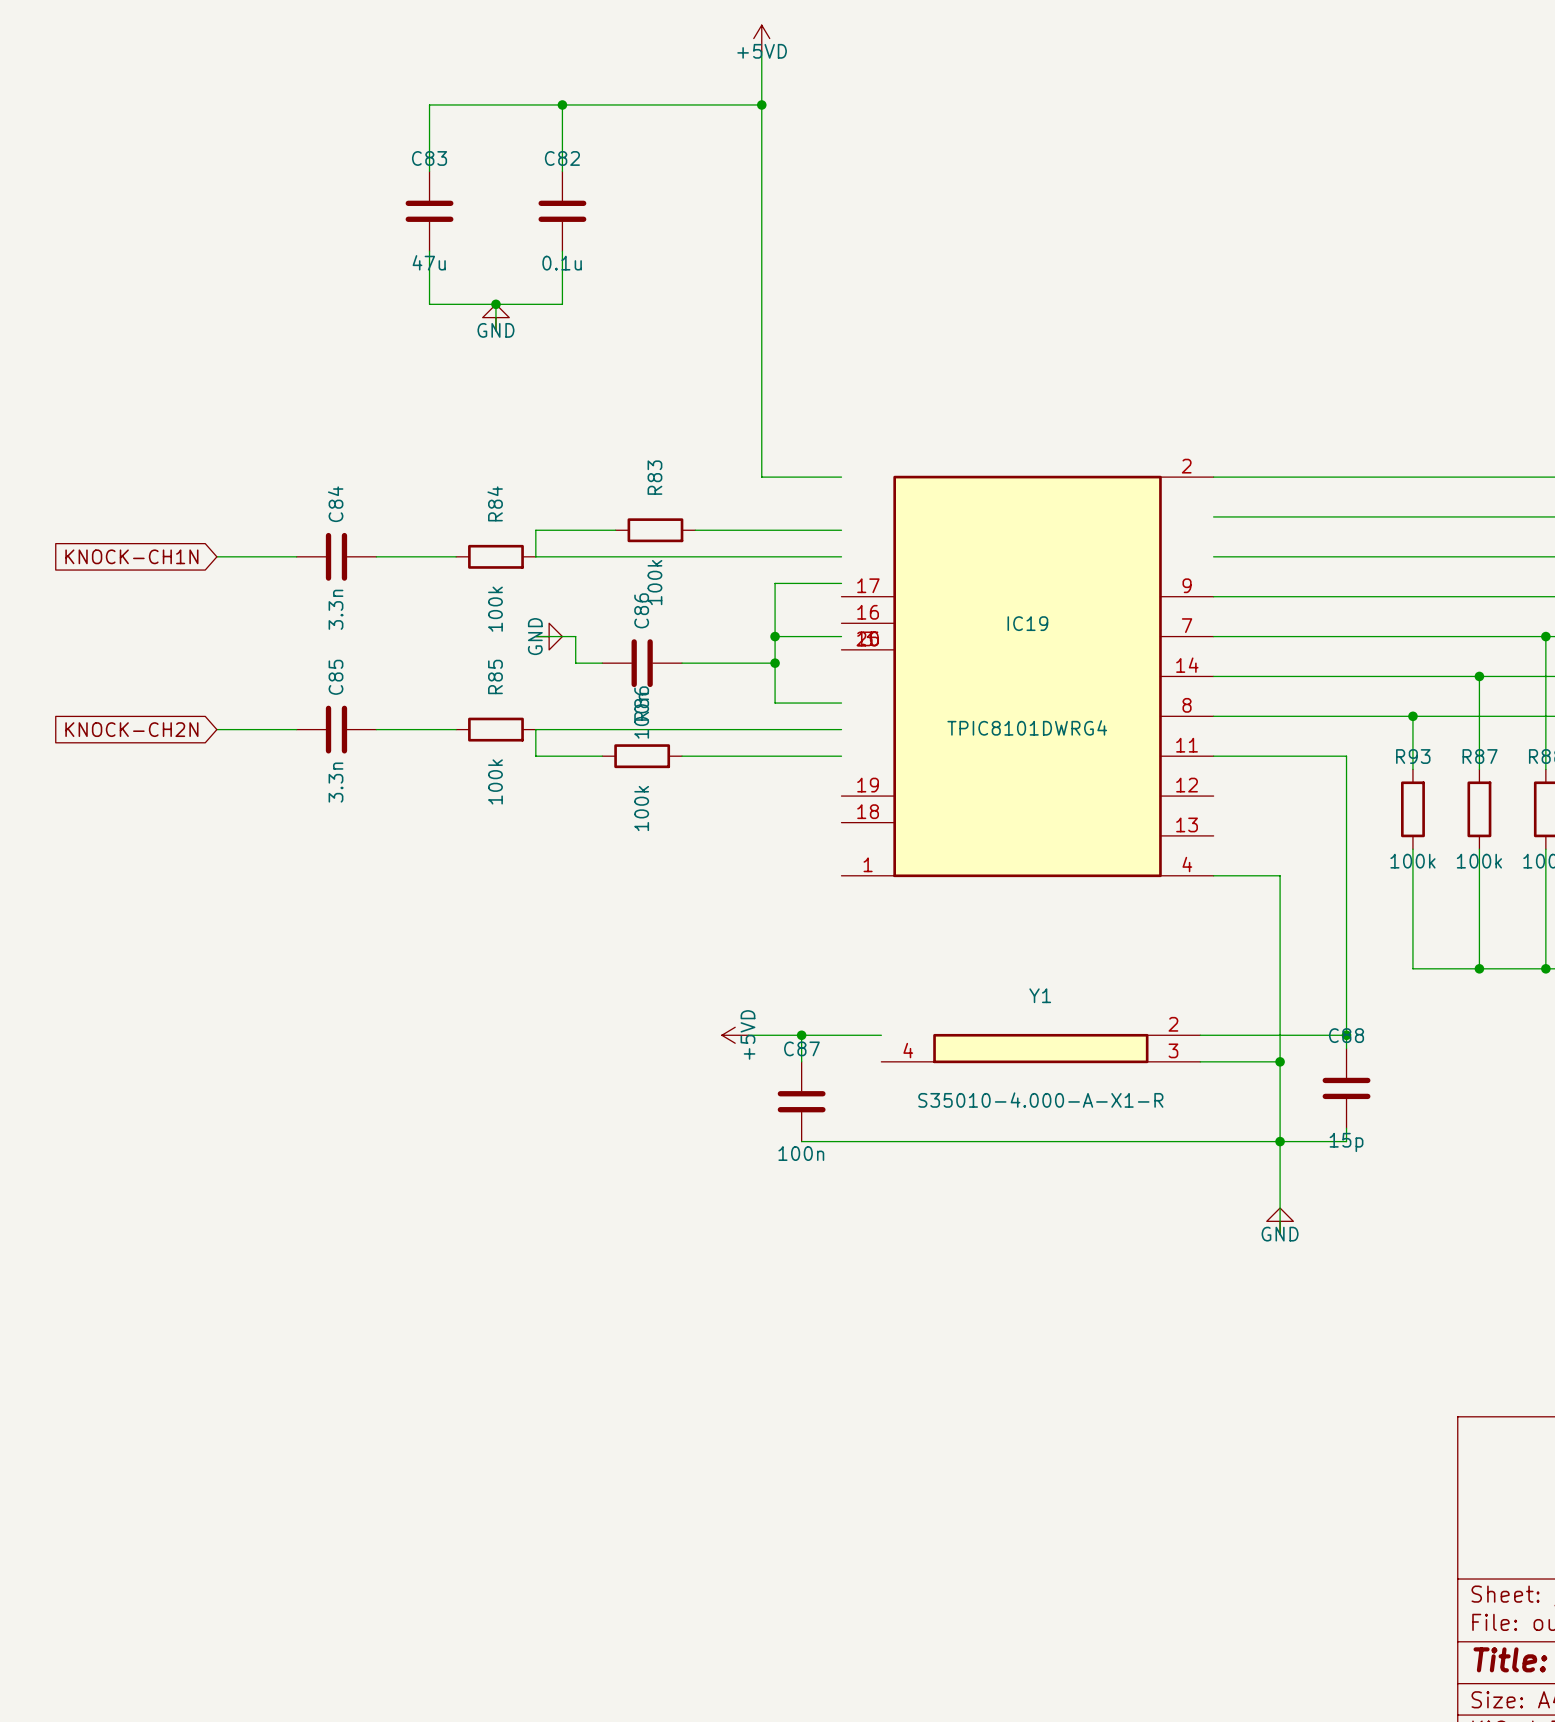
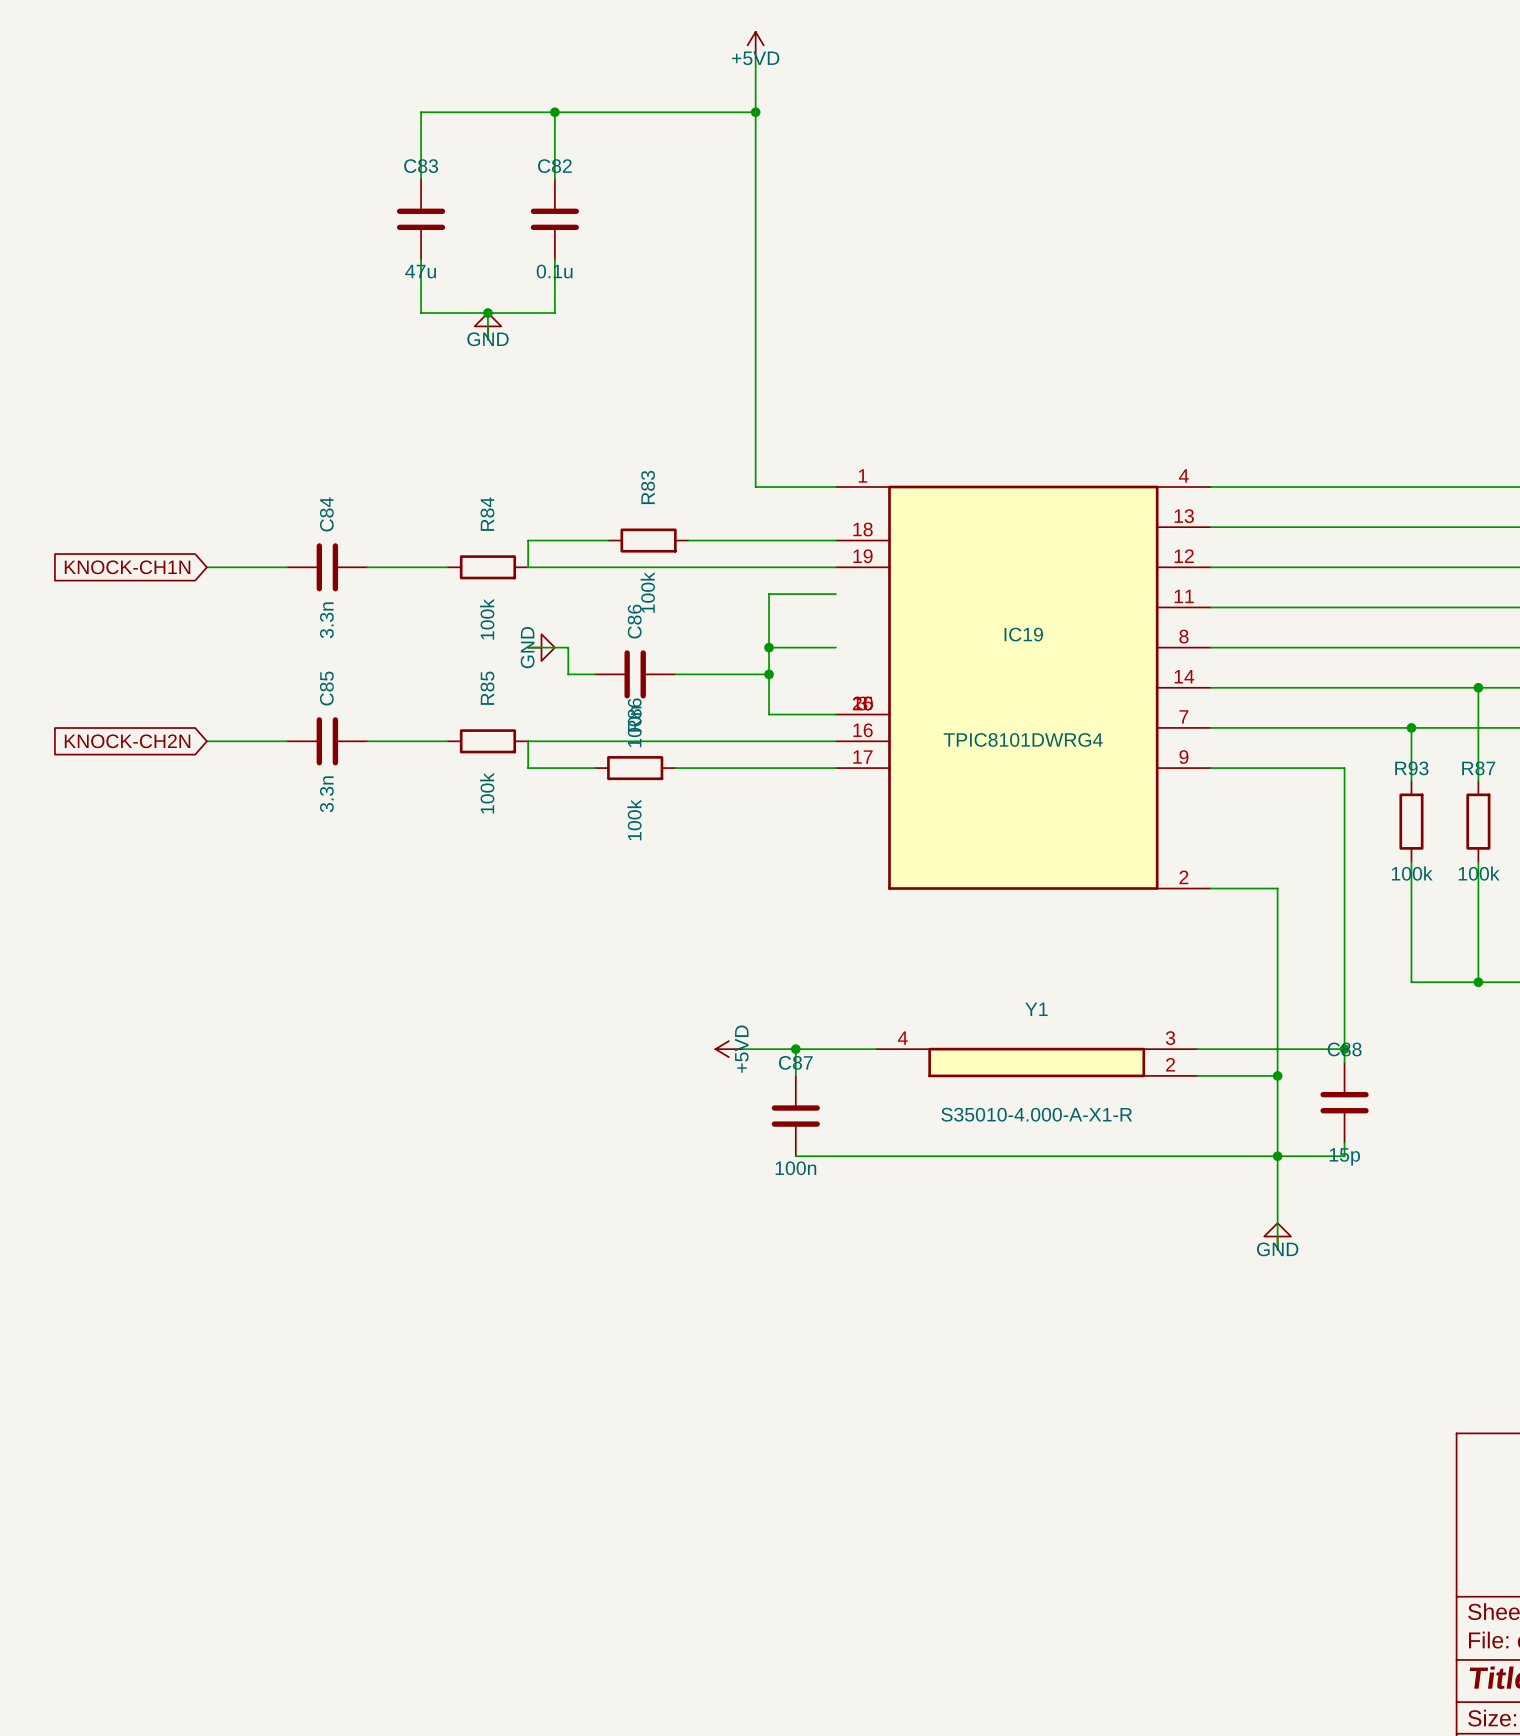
IC19 flip: as is (1027, 676) -> up-down (1023, 687)
Y1 flip: as is (1040, 1048) -> up-down (1036, 1062)

